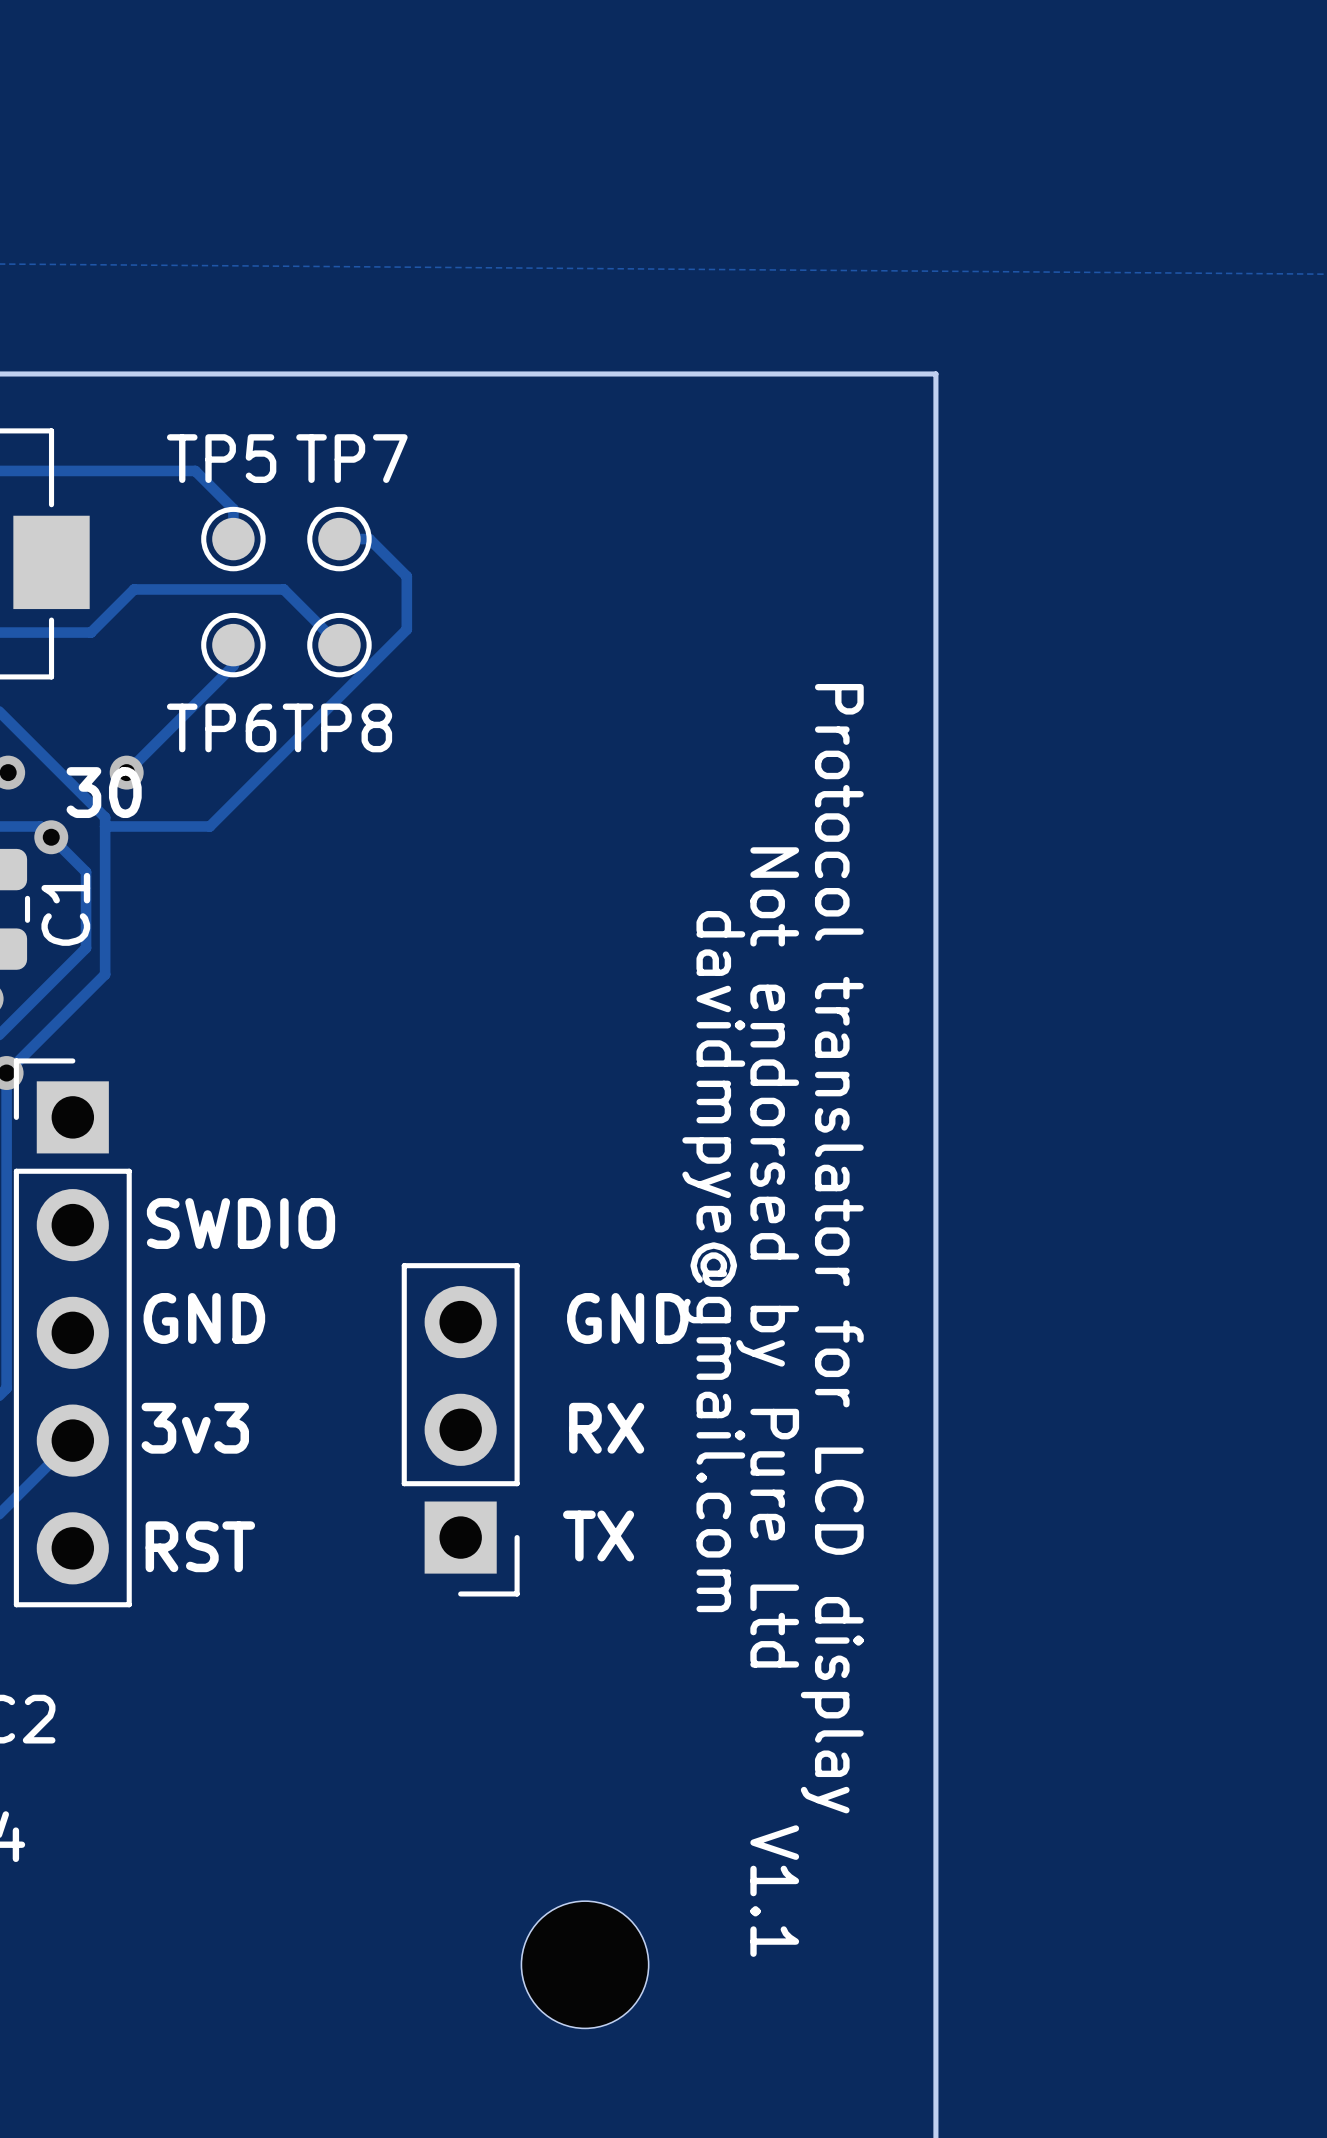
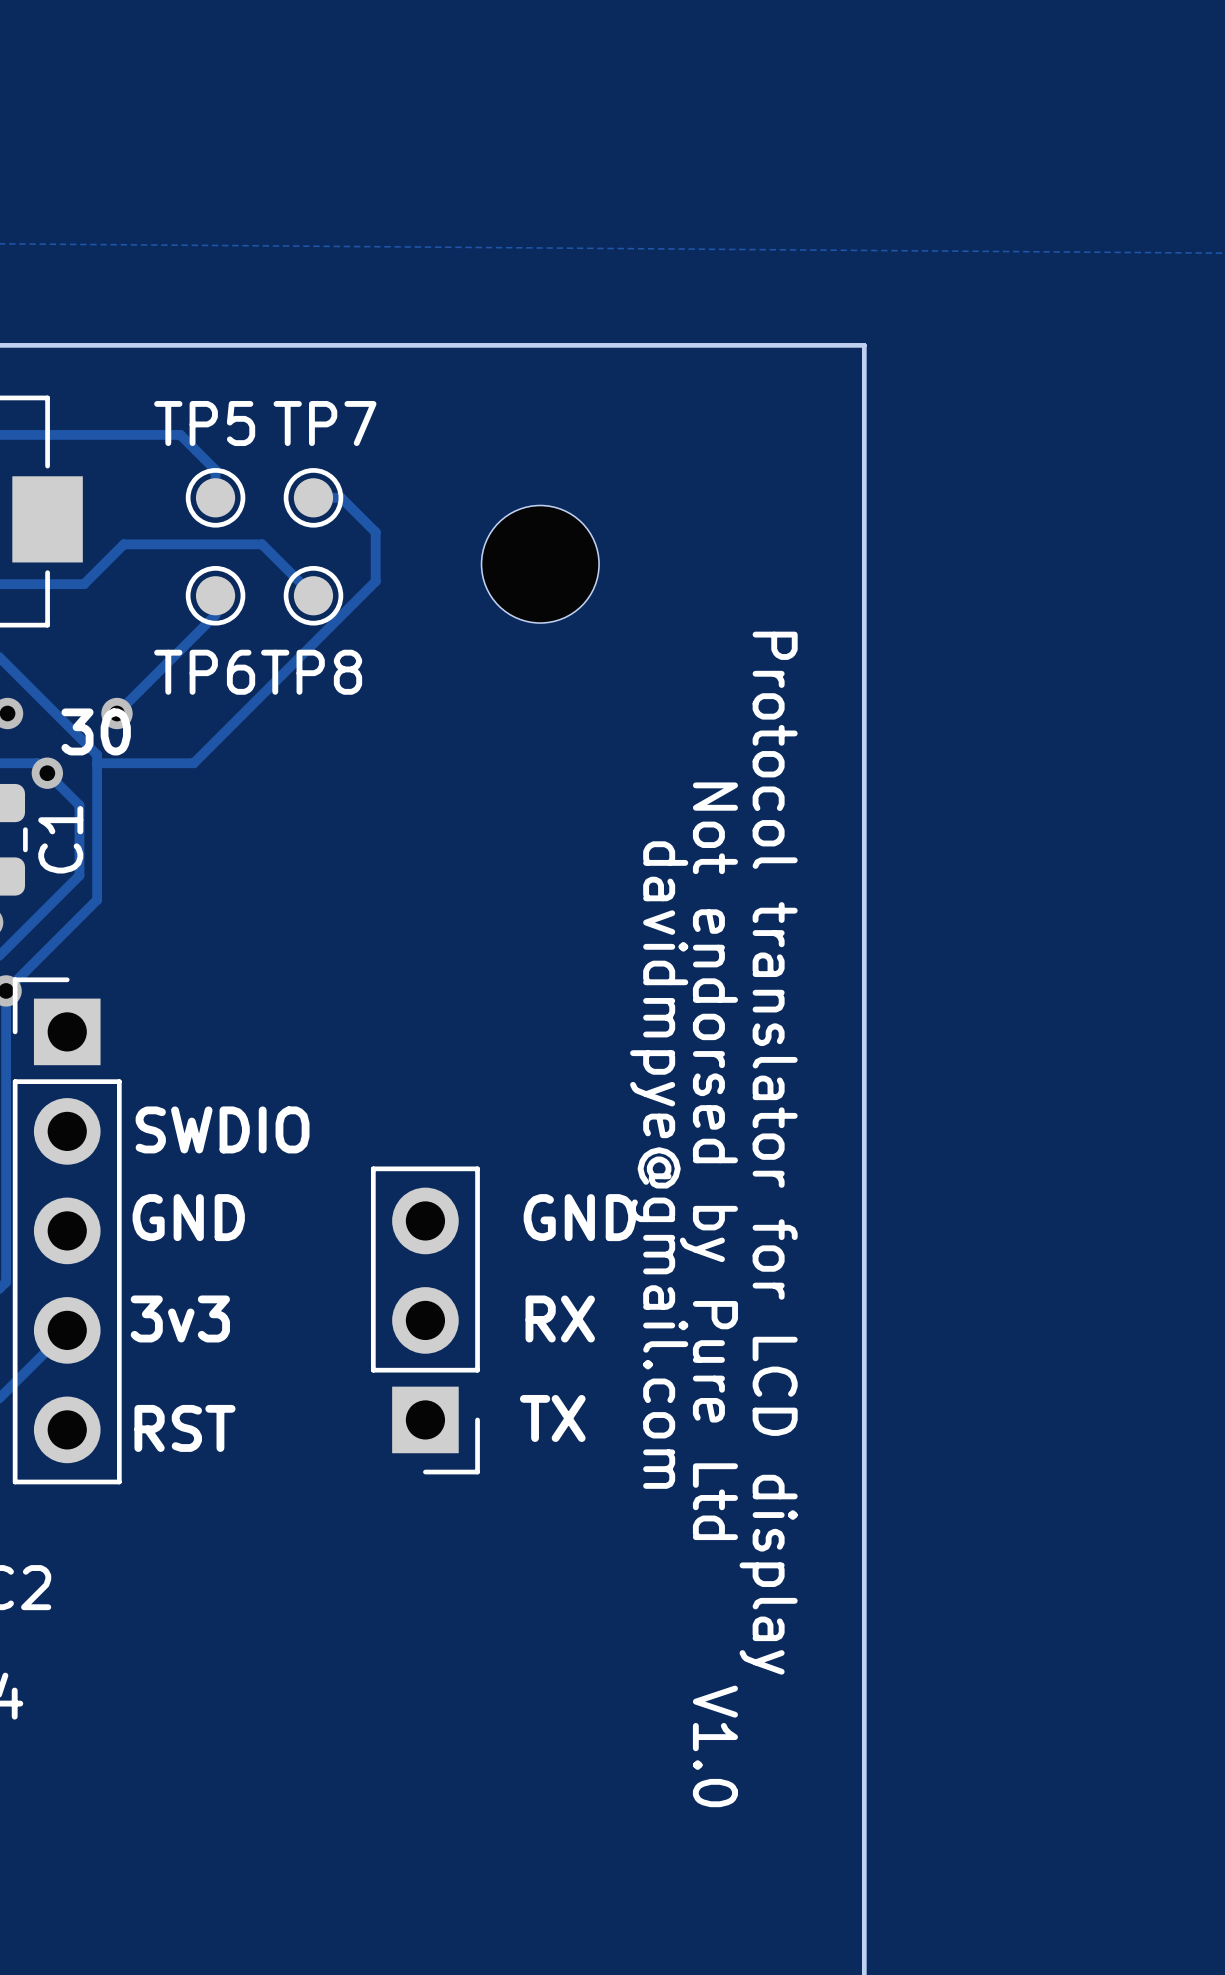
part: none -> (540, 564)
text: V1.1 (774, 1891) -> V1.0 (715, 1746)
part: (585, 1964) -> none

